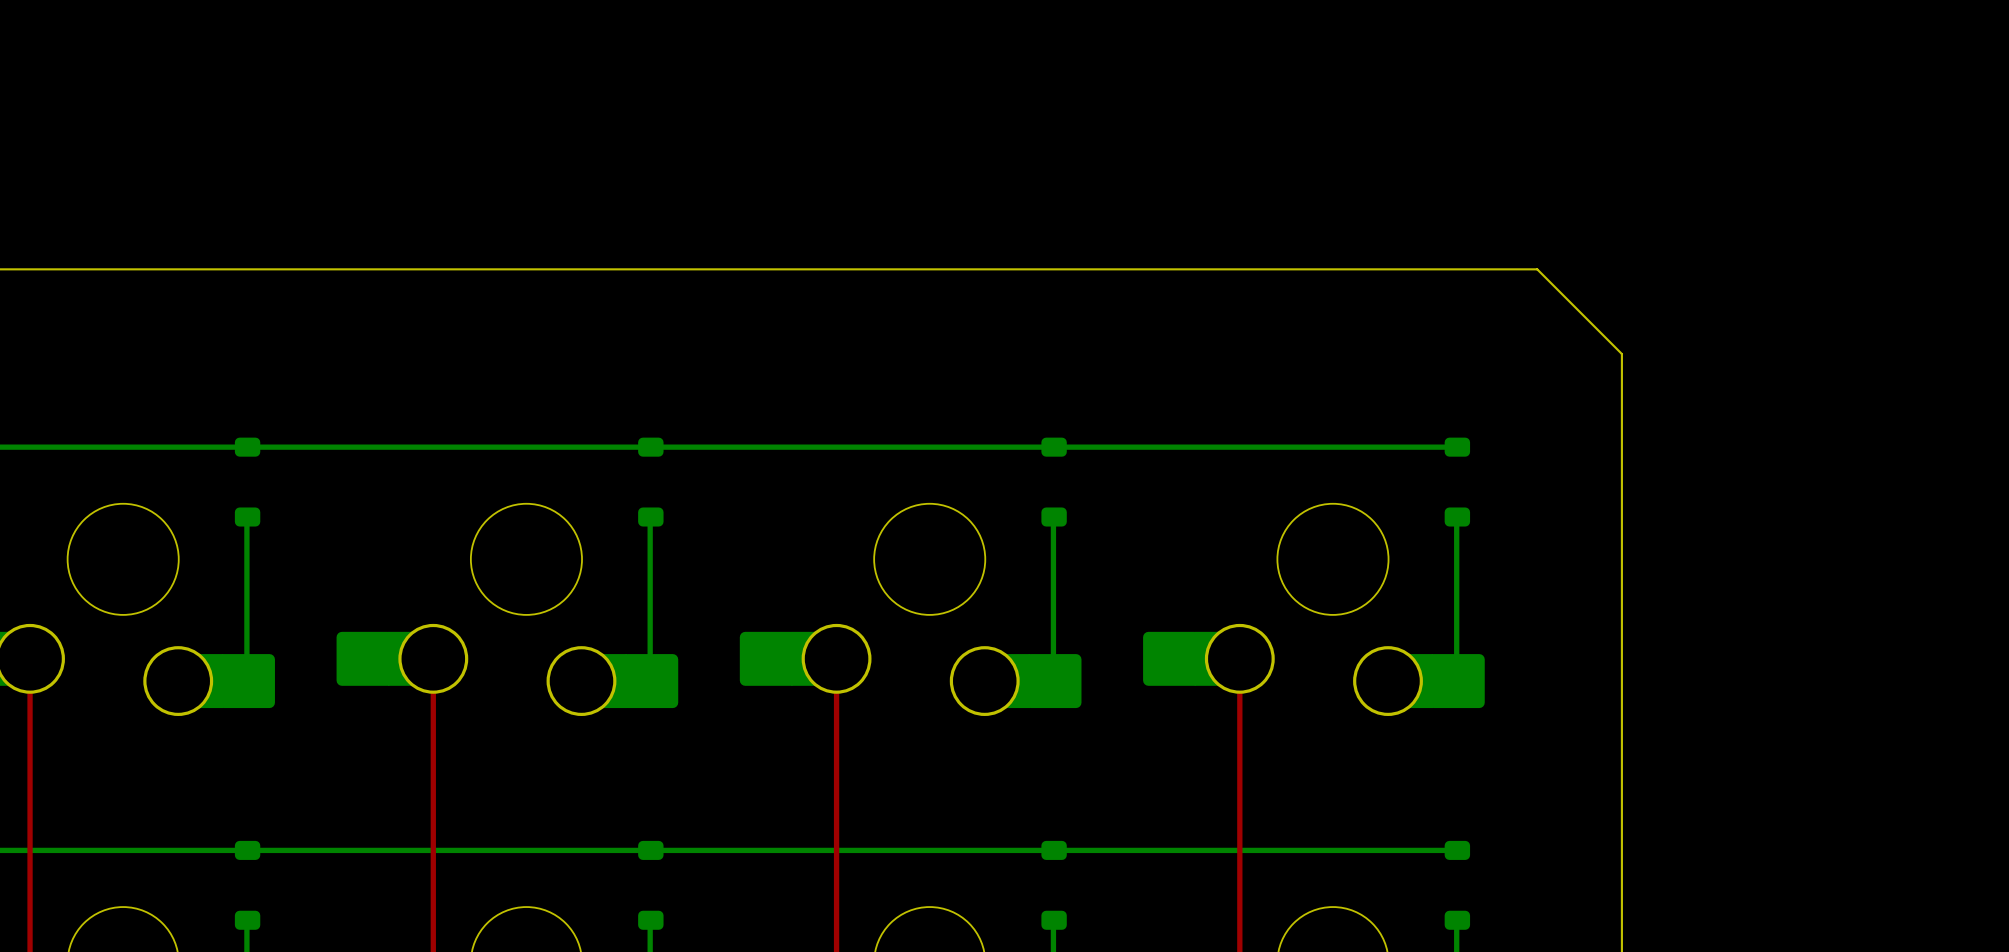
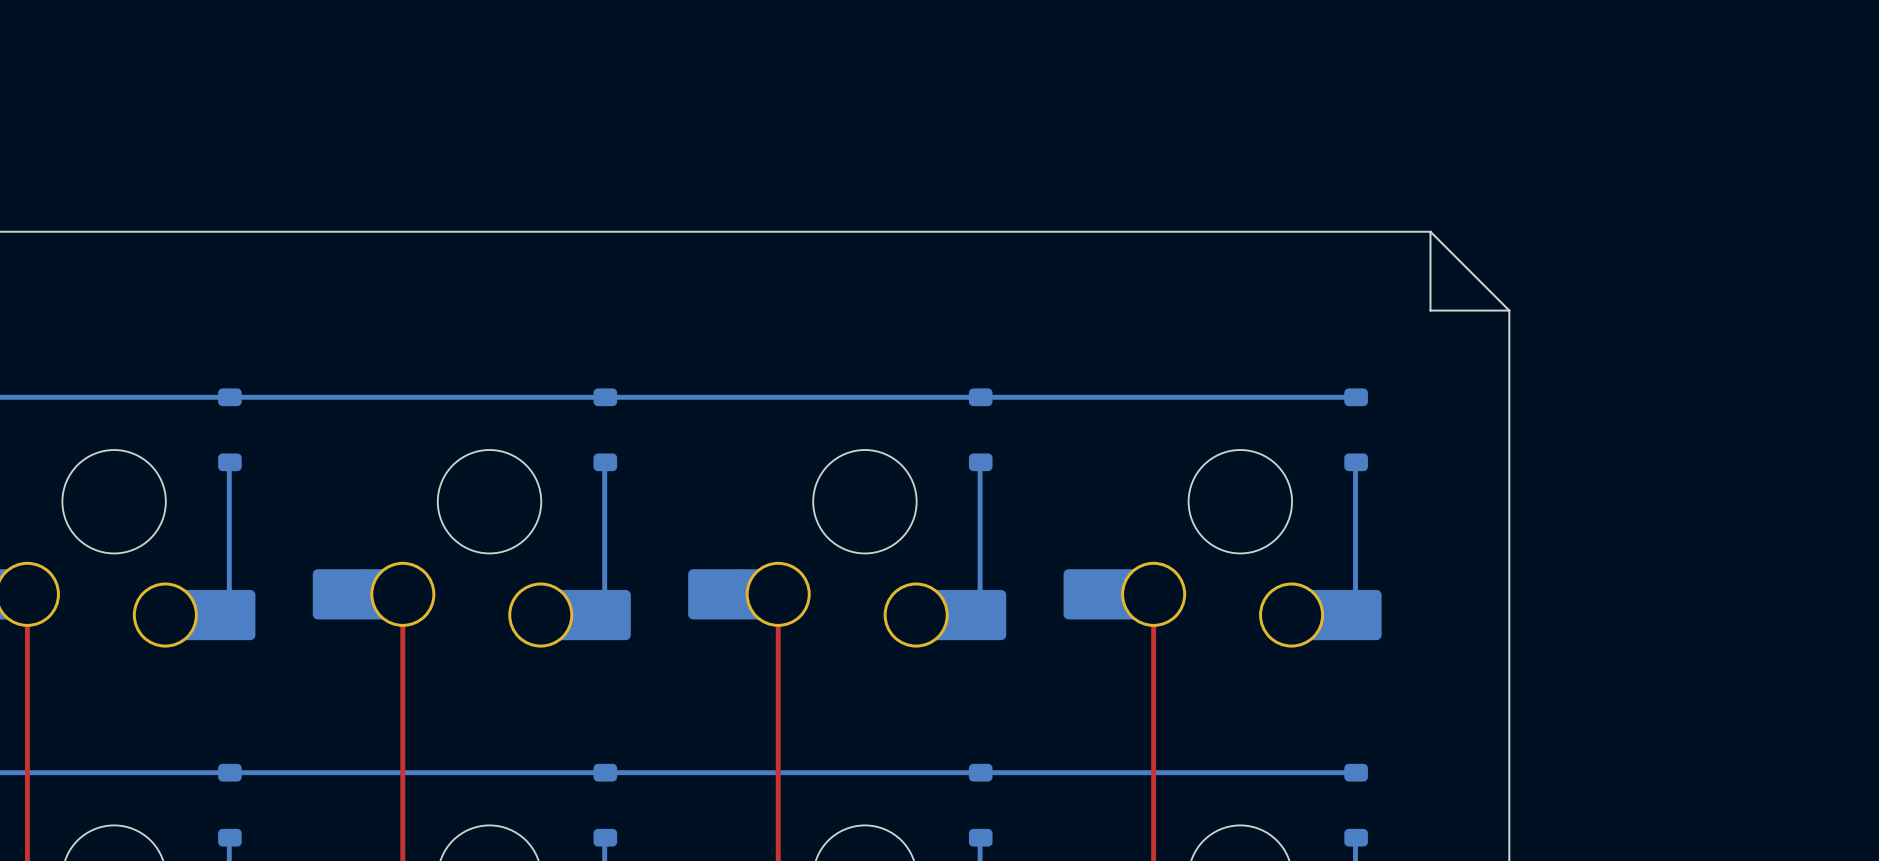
board edge: none -> (1430, 231) (1430, 310) (1509, 310)

